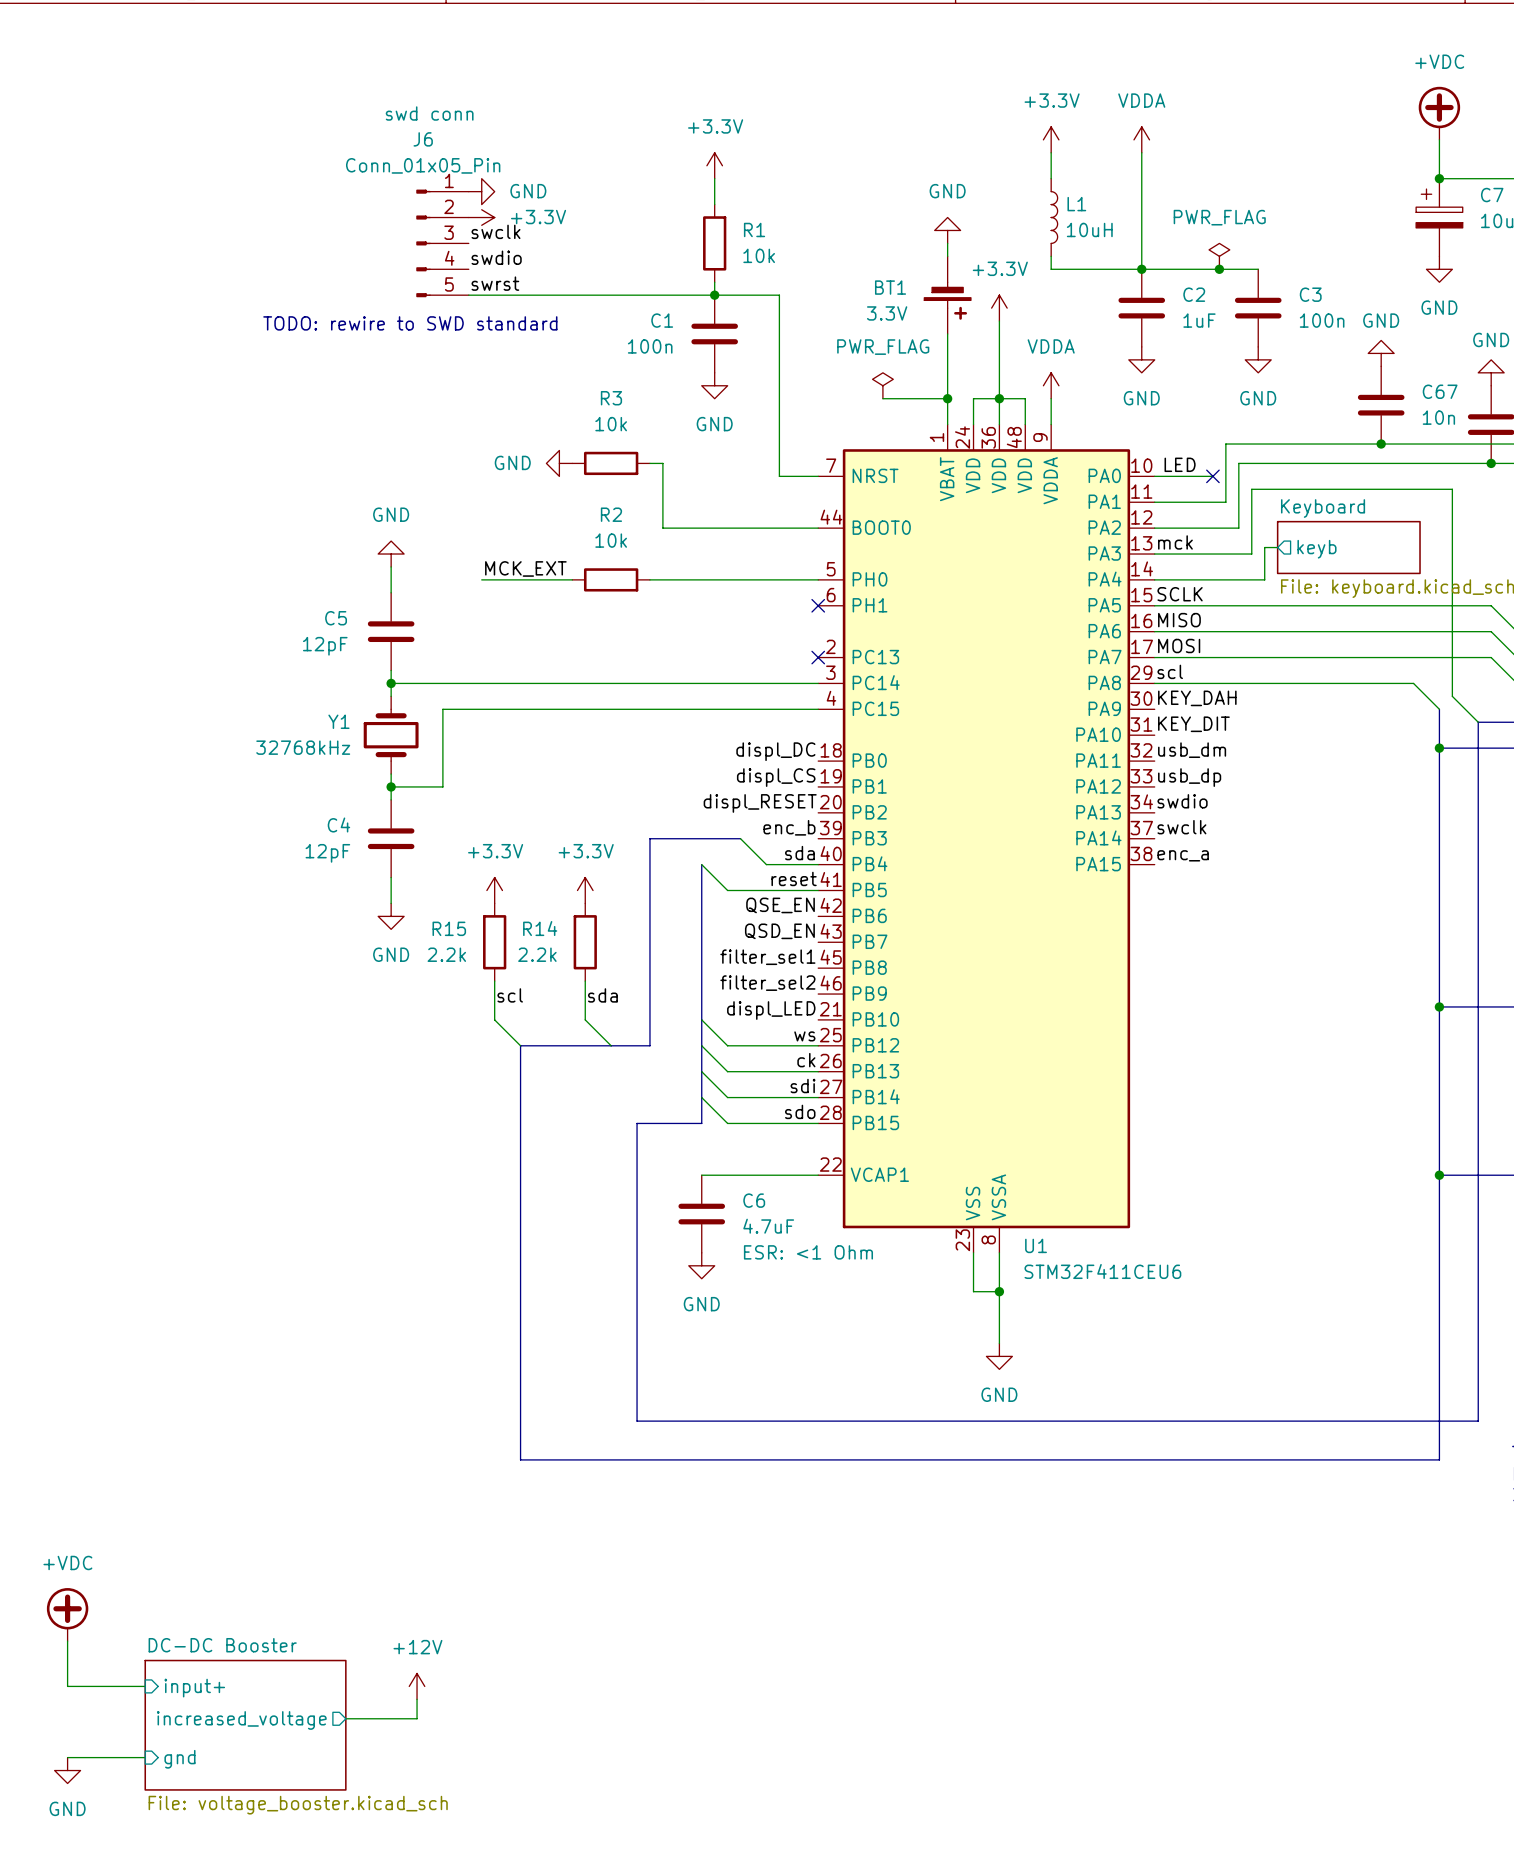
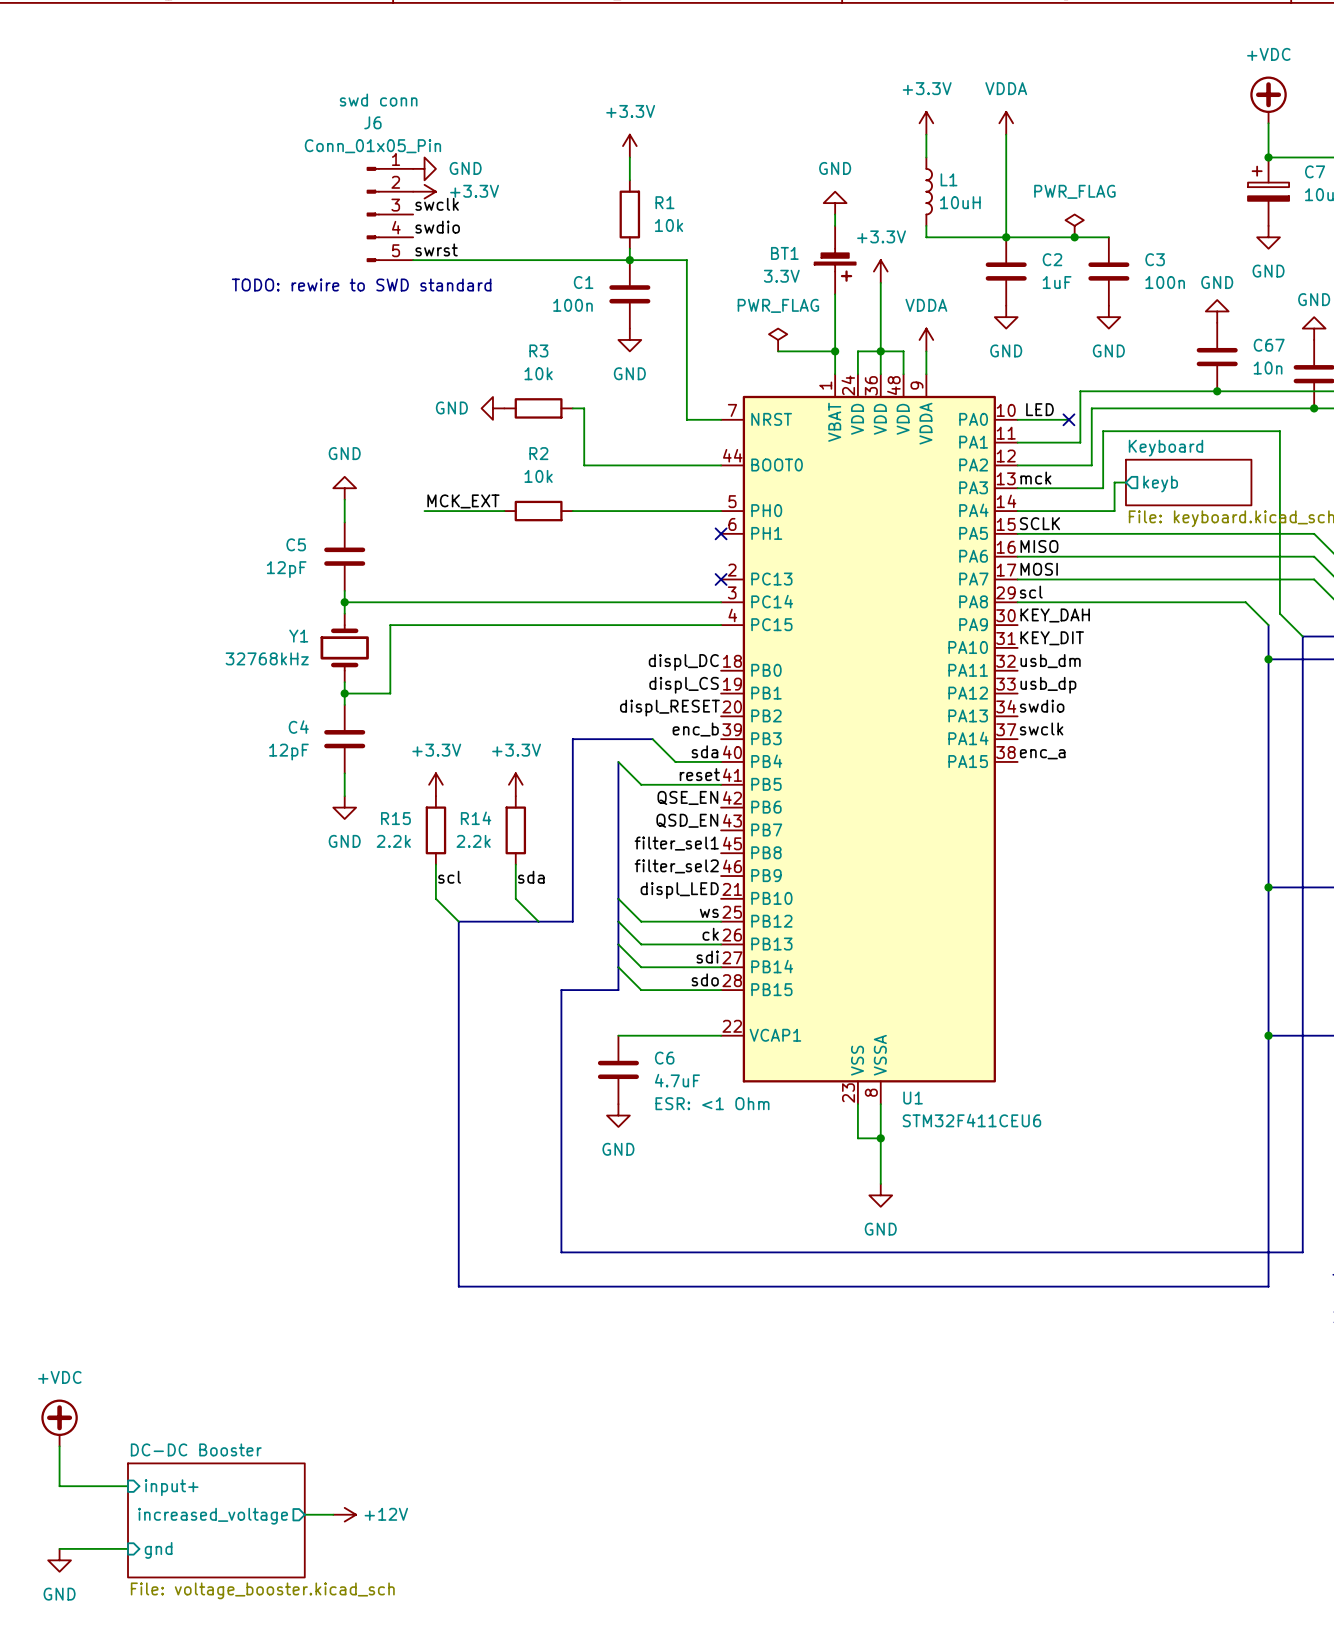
power symbol rotation: 0° (417, 1686) -> 90° clockwise (344, 1514)
power symbol position: +12V (417, 1686) -> +12V (344, 1514)
wire: (417, 1699) (417, 1718) (378, 1718) -> none

